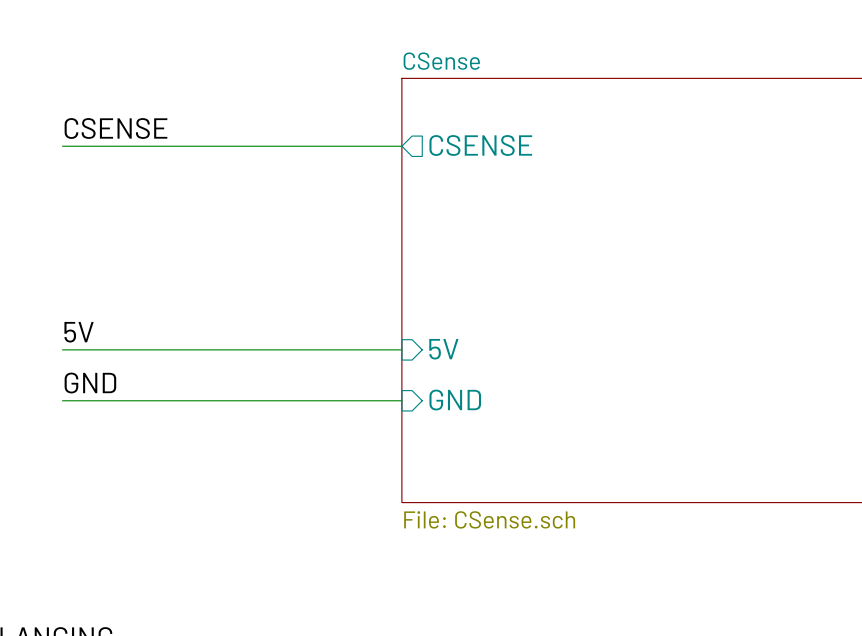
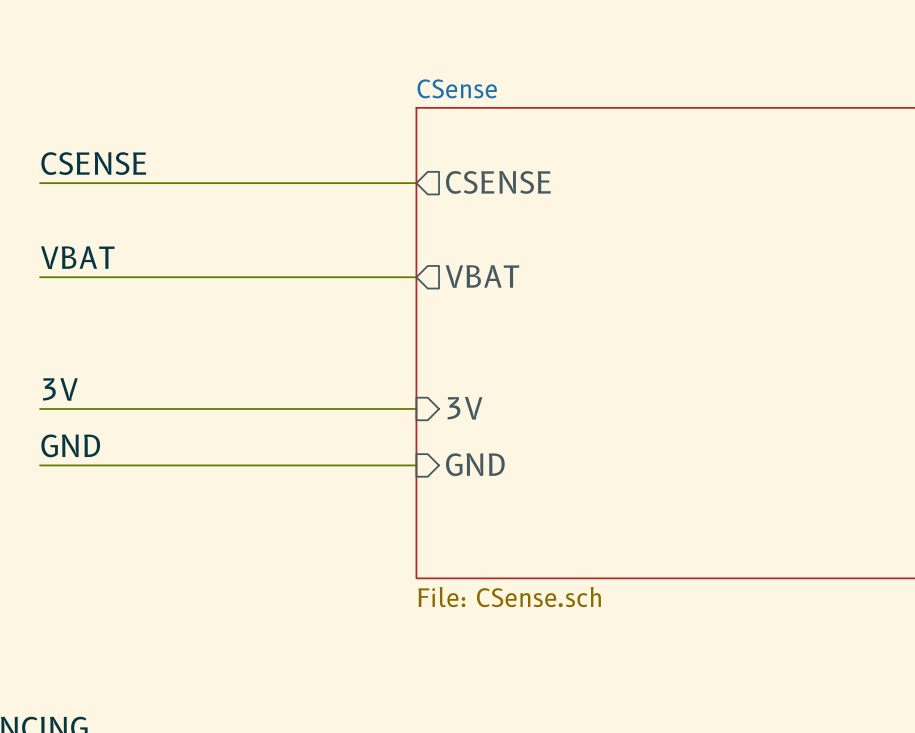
label: none -> VBAT (77, 257)
sheet pin: none -> VBAT (482, 276)
wire: none -> (40, 277) (416, 277)
label: 5V (79, 332) -> 3V (60, 389)
sheet pin: 5V (443, 349) -> 3V (465, 408)

